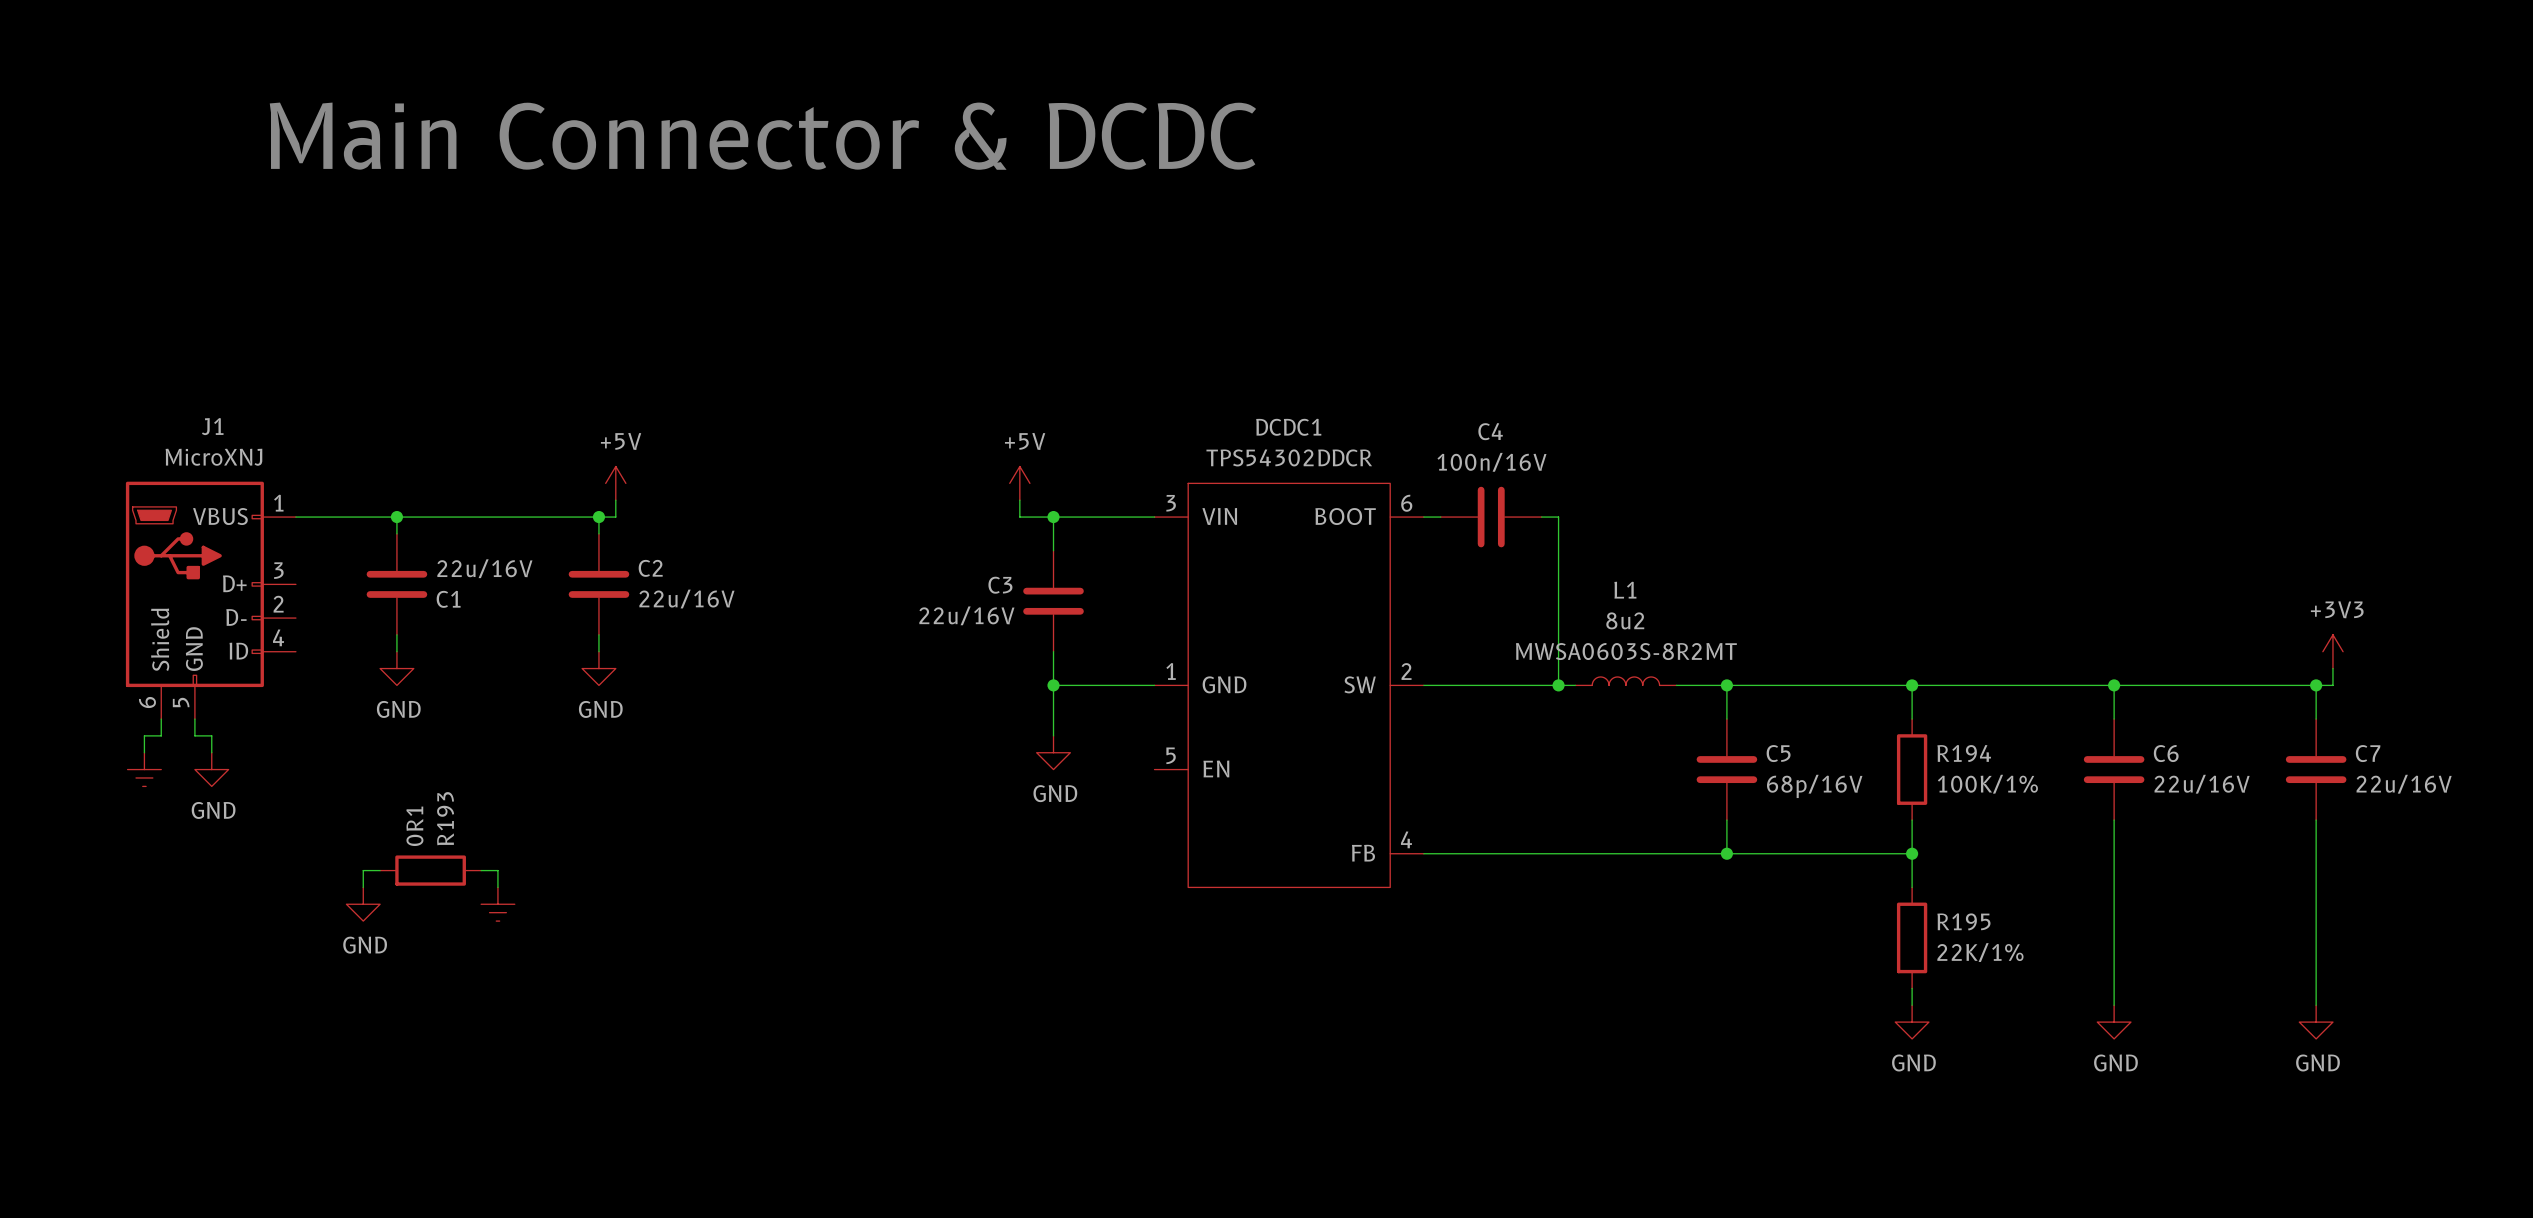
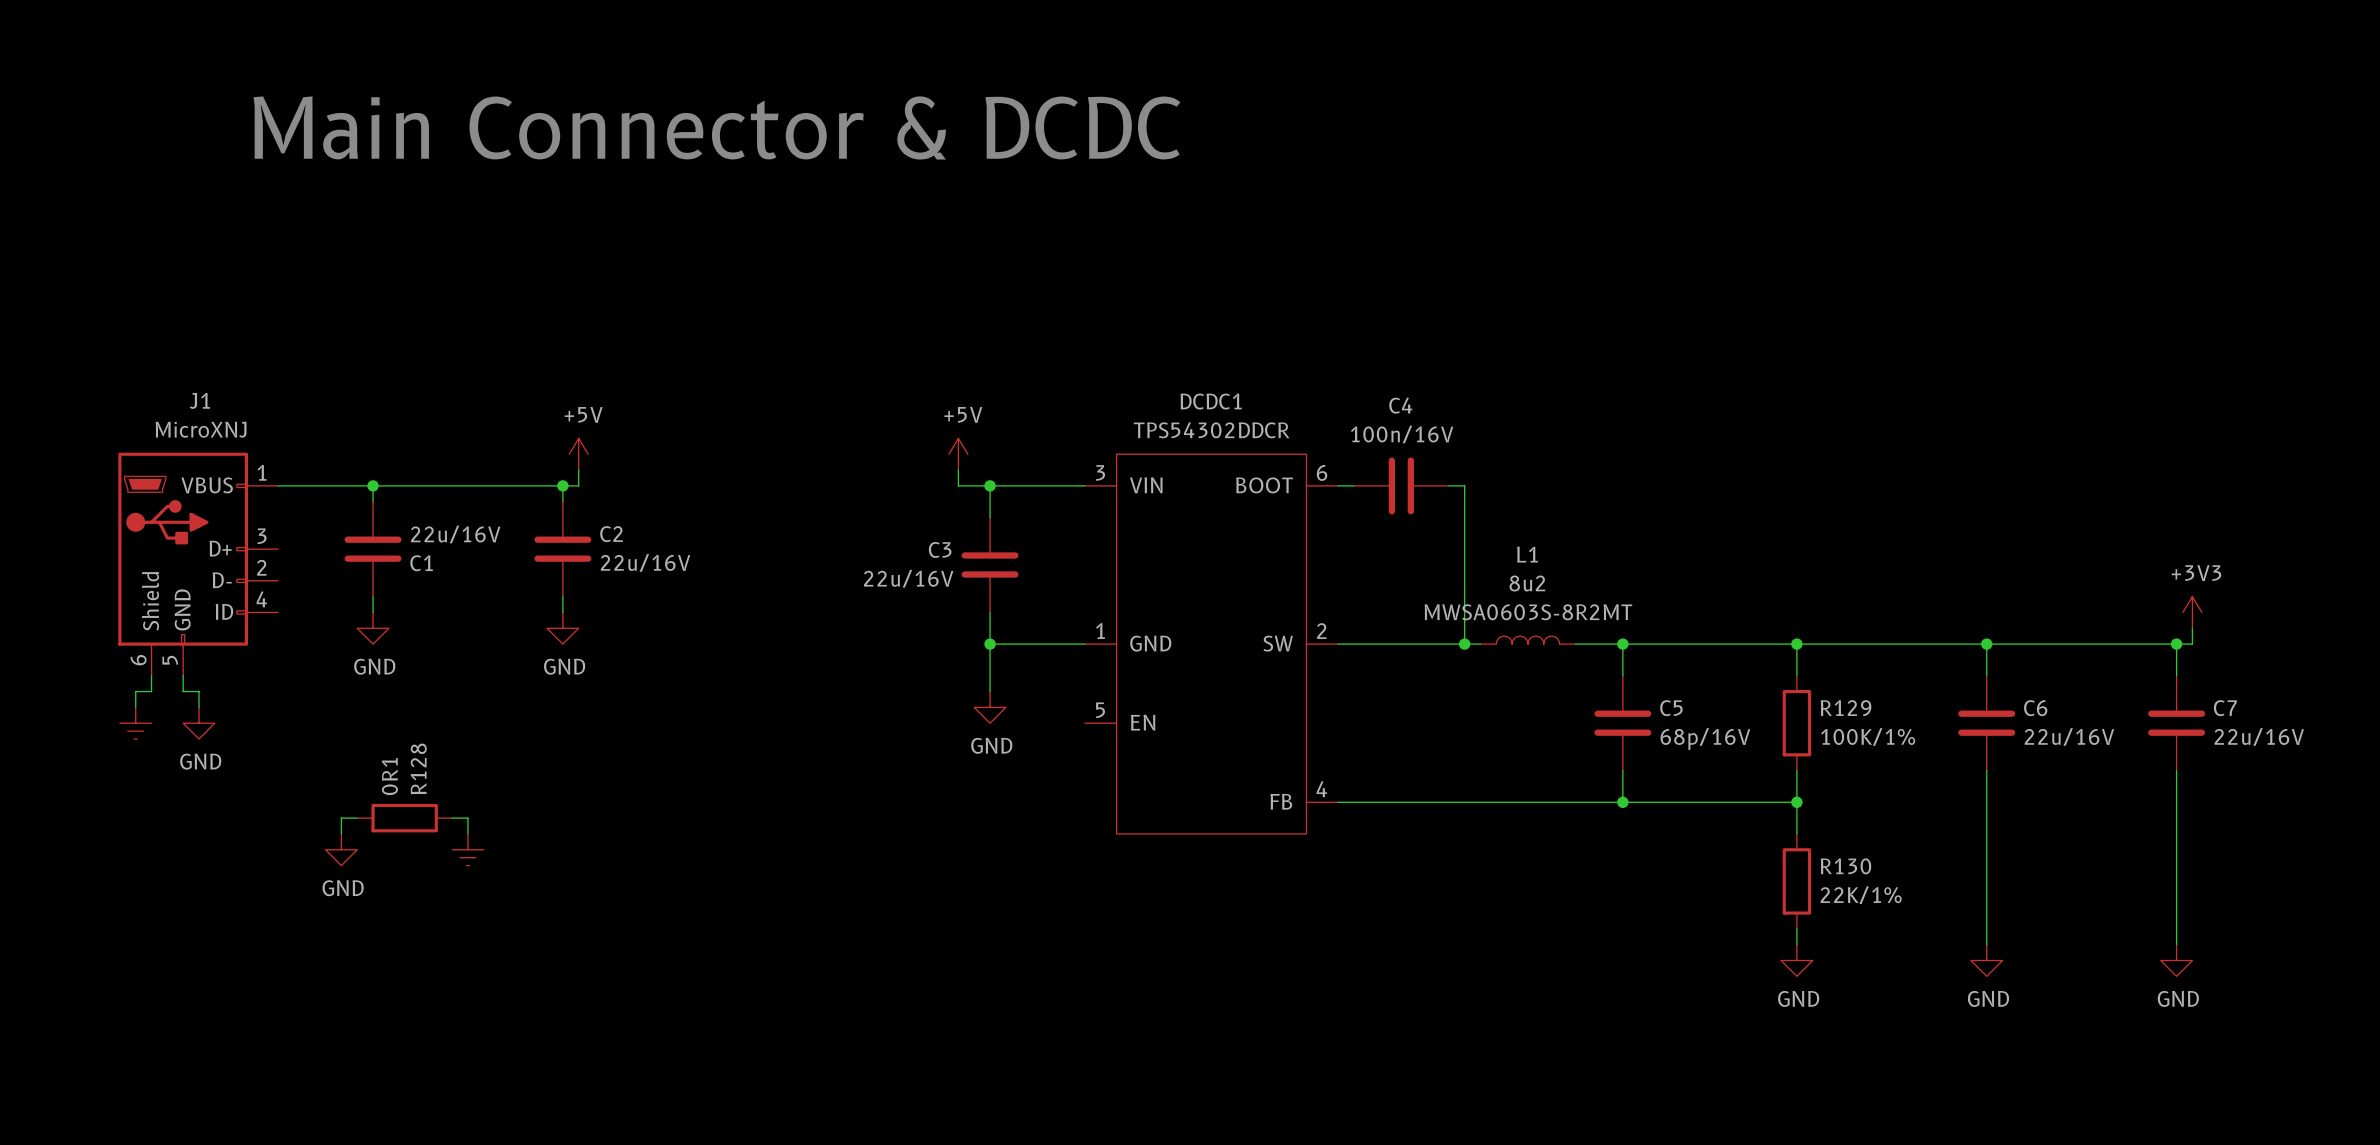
R194 name: R194 (1964, 753) -> R129 (1845, 708)
R193 name: R193 (445, 818) -> R128 (418, 768)
R195 name: R195 (1963, 921) -> R130 (1845, 866)

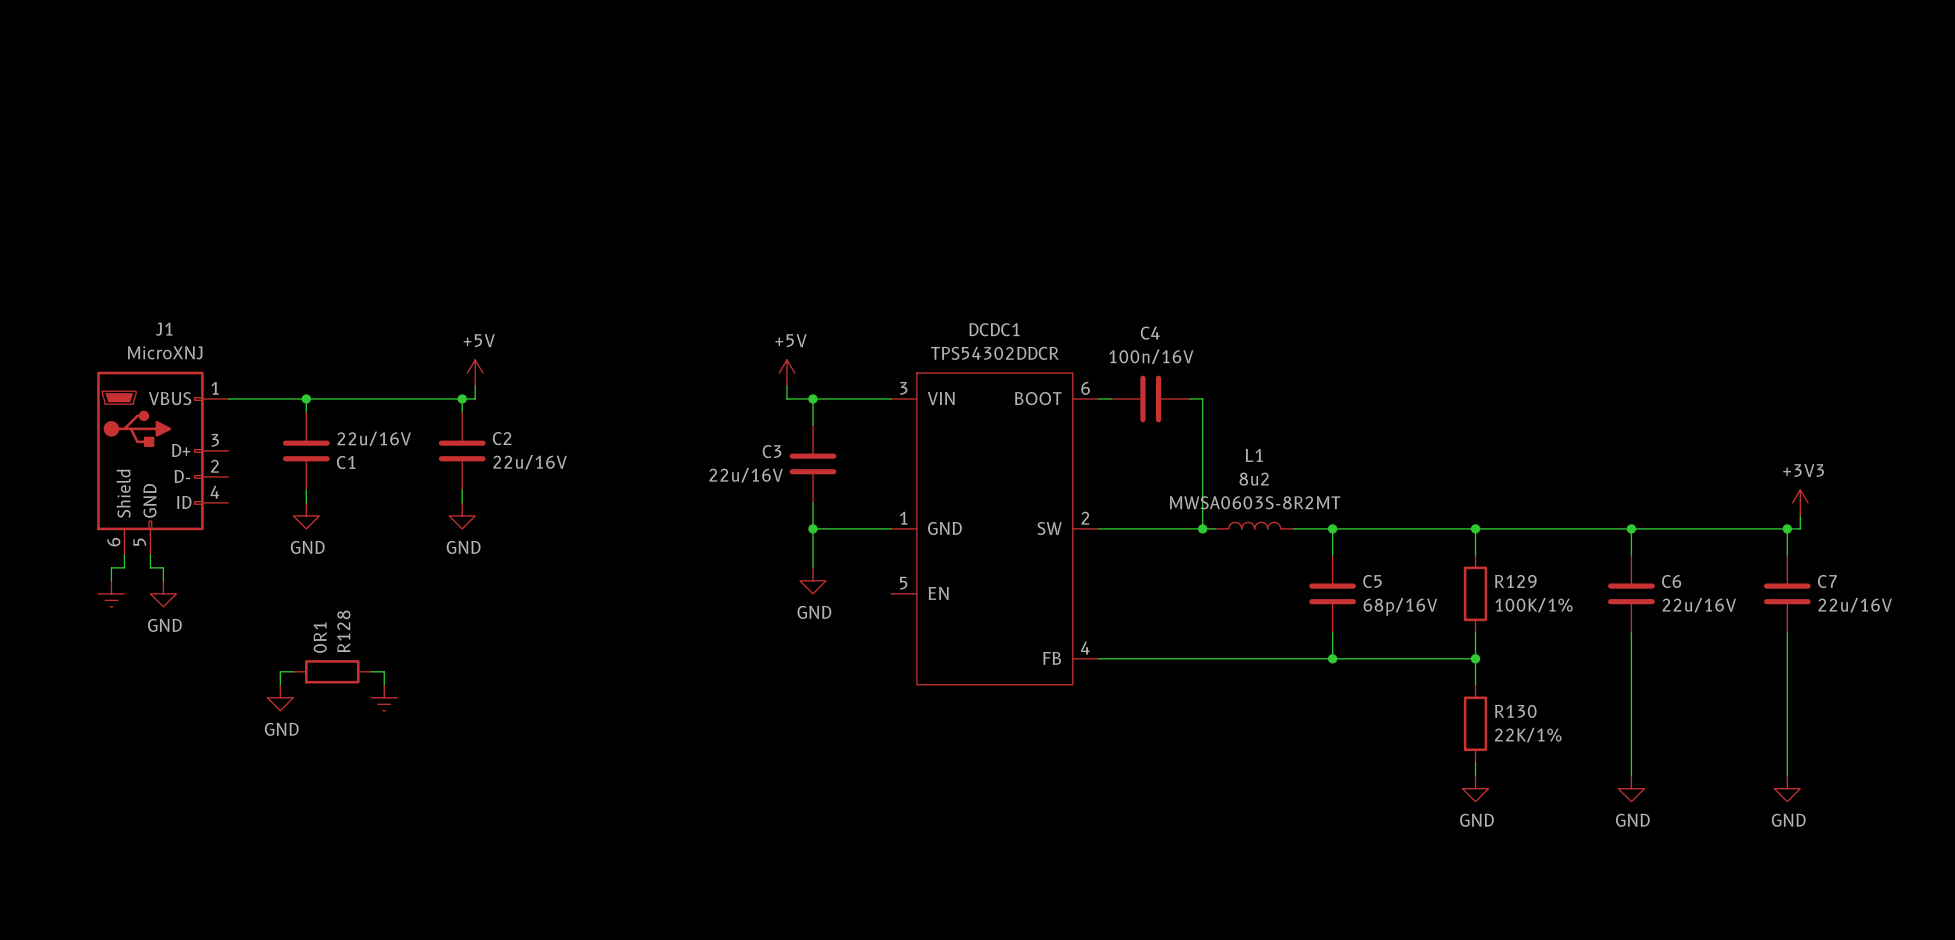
text: Main Connector & DCDC (716, 127) -> none

